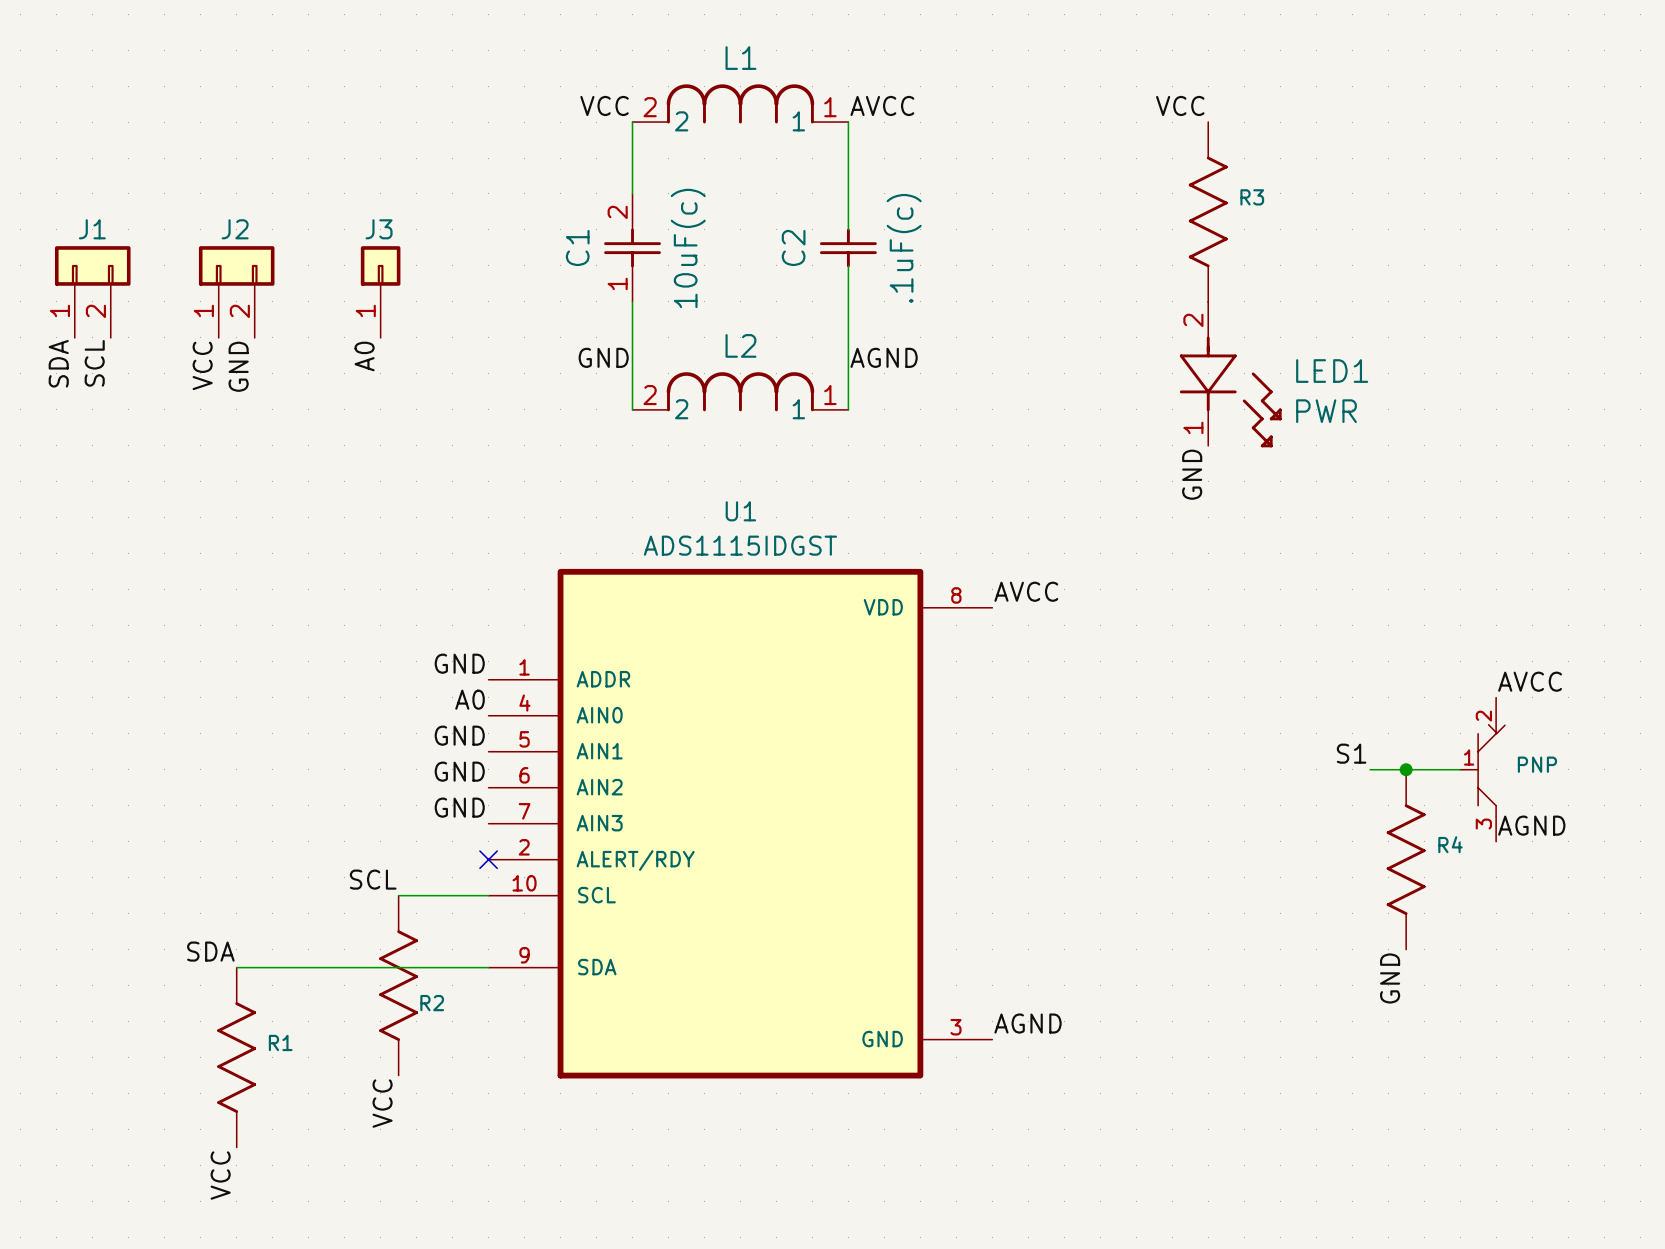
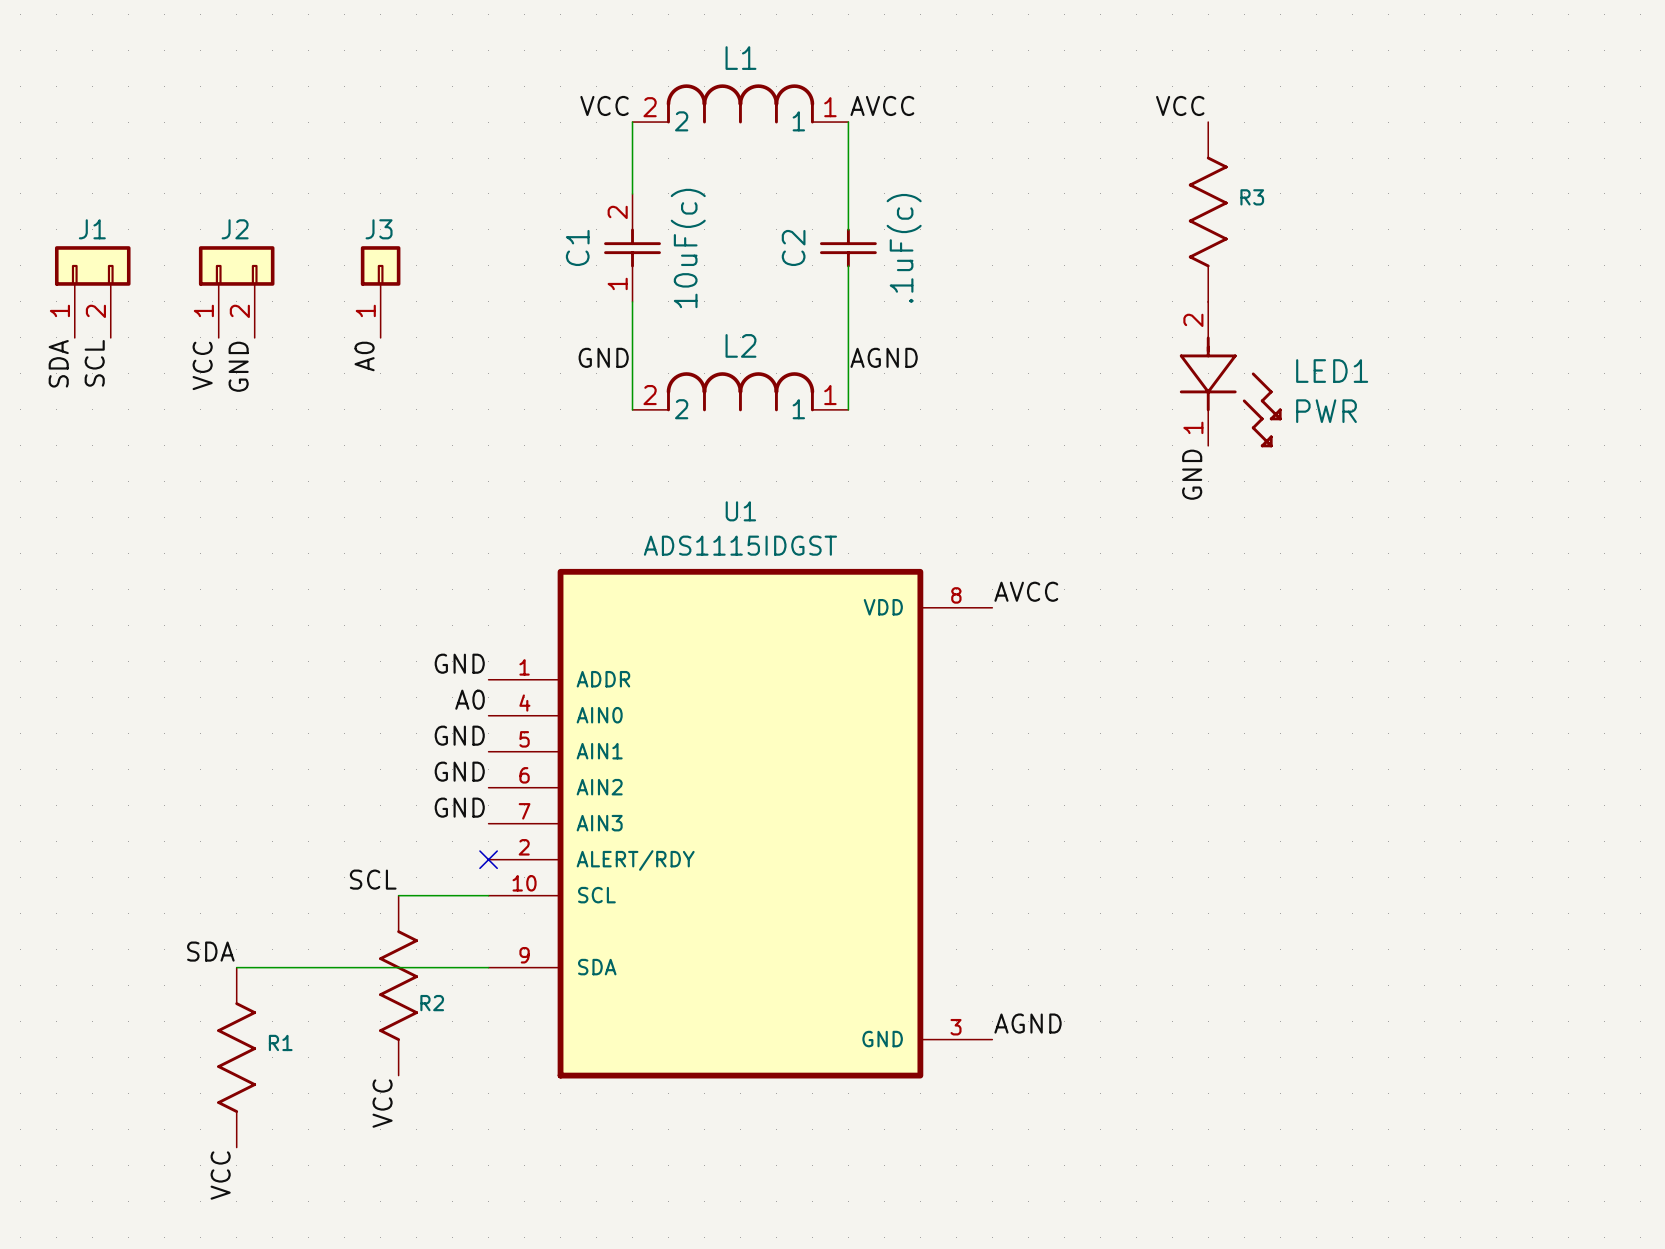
label: AVCC (1530, 681) -> none
label: S1 (1351, 753) -> none
wire: (1370, 769) (1460, 769) -> none
junction: (1406, 769) -> none
part: PNP (1482, 769) -> none
label: AGND (1531, 825) -> none
R4: (1406, 859) -> none
label: GND (1390, 978) -> none

